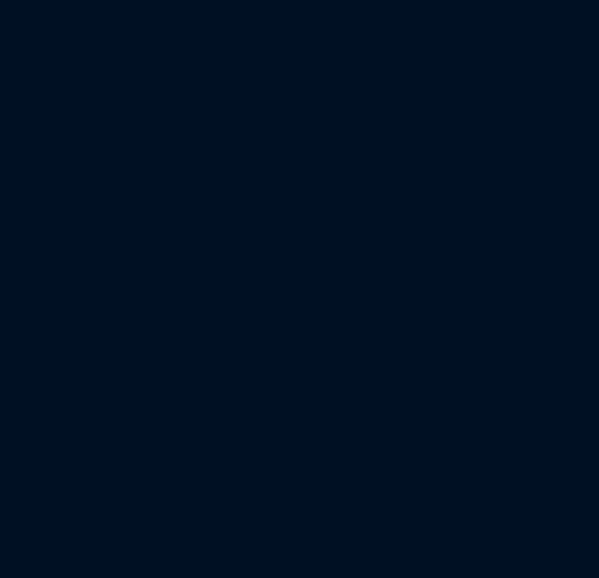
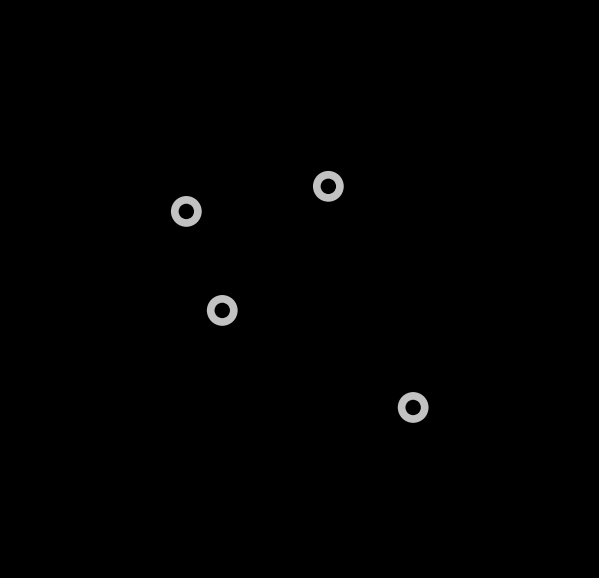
via: none -> (328, 186)
via: none -> (186, 211)
via: none -> (222, 310)
via: none -> (413, 407)

